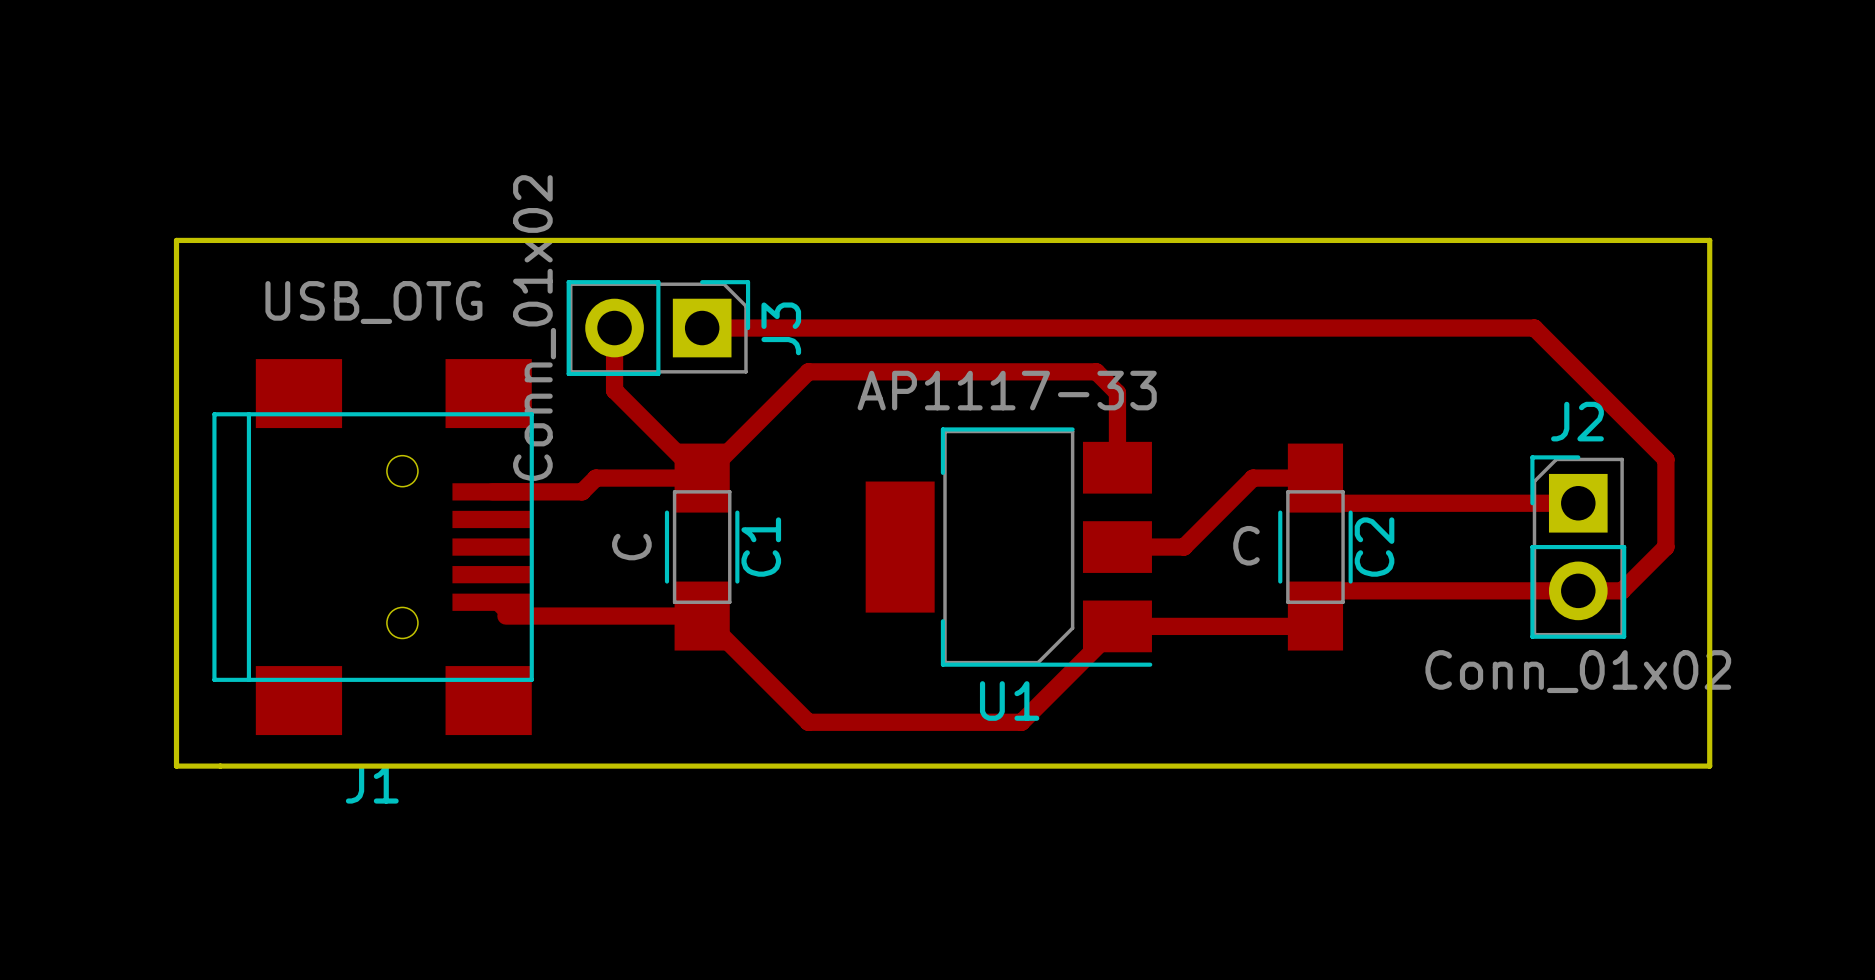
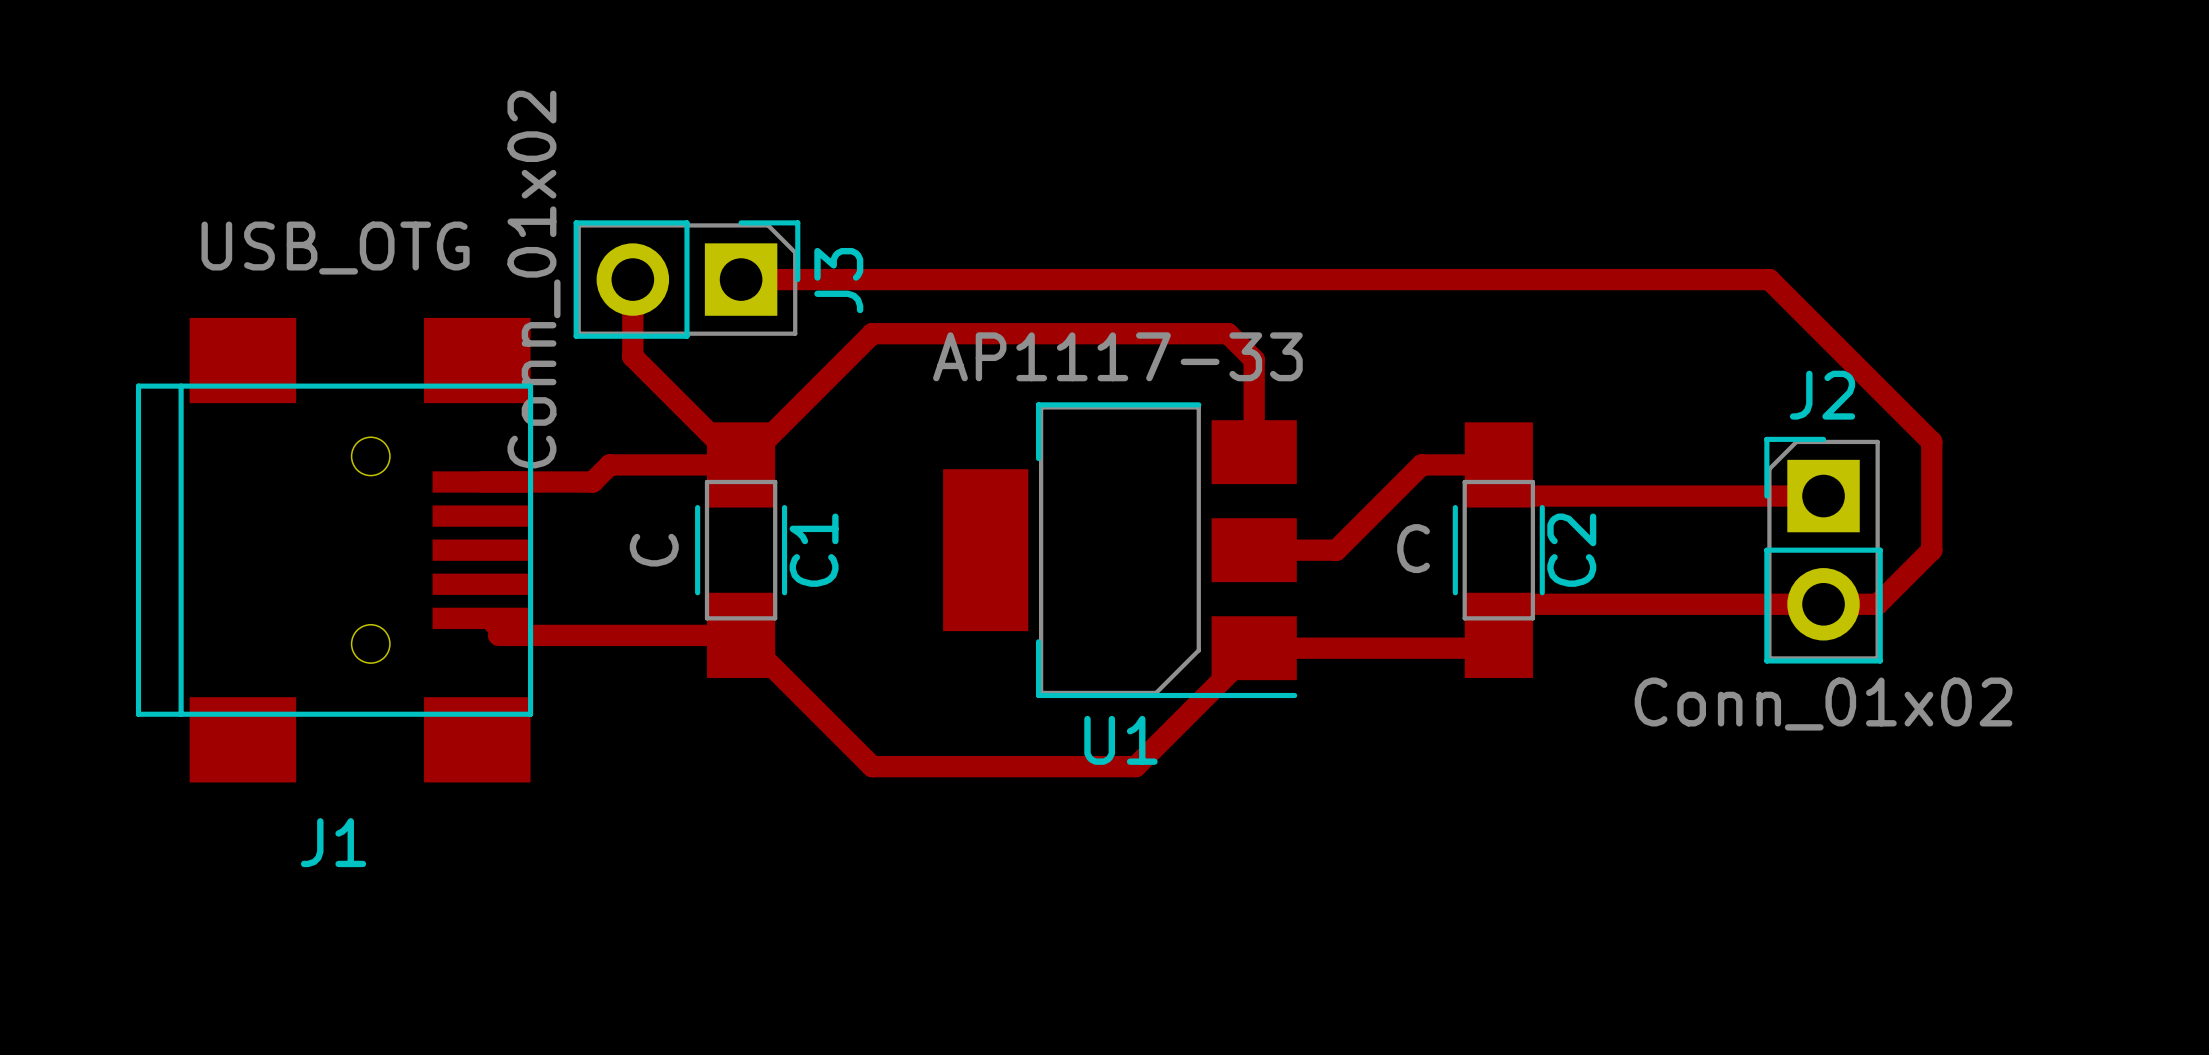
board edge: (176, 240) (176, 766) (1709, 766) (1709, 240) (176, 240) -> none

